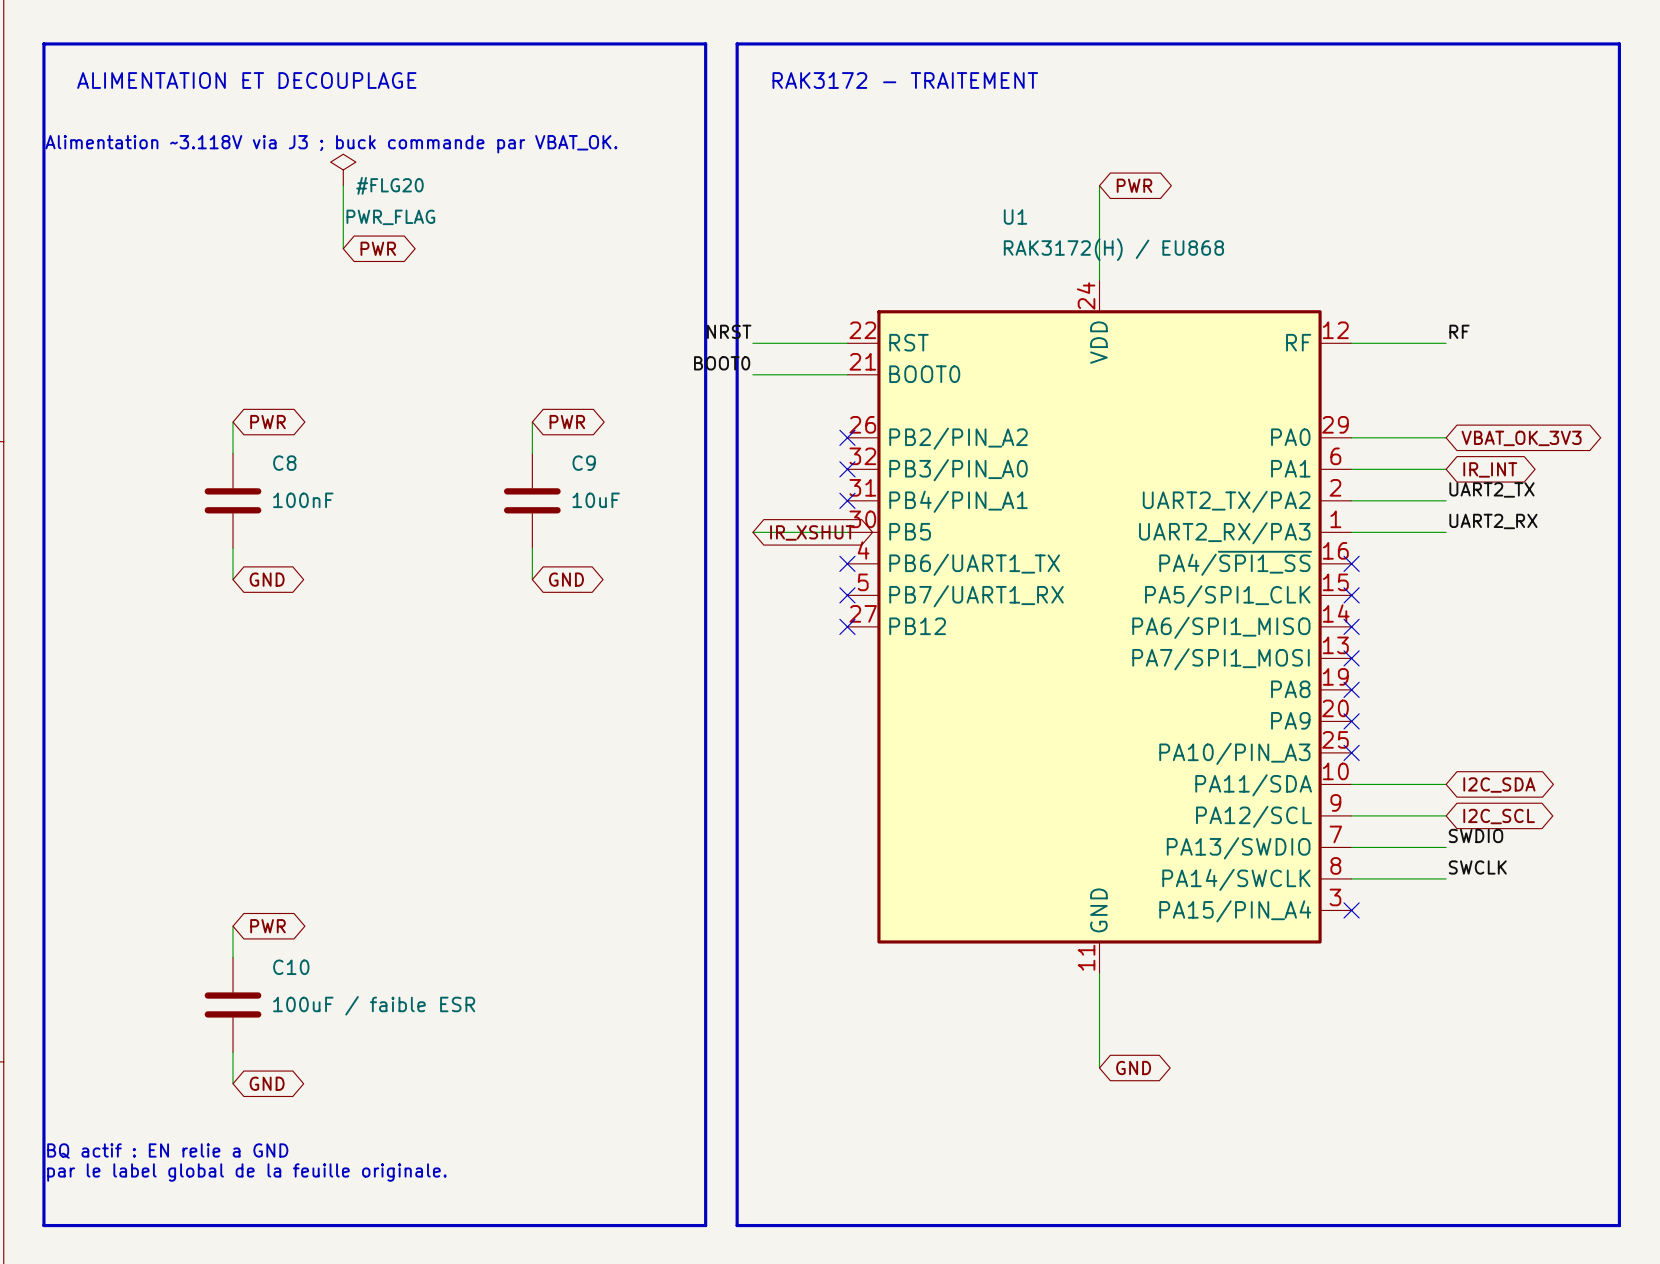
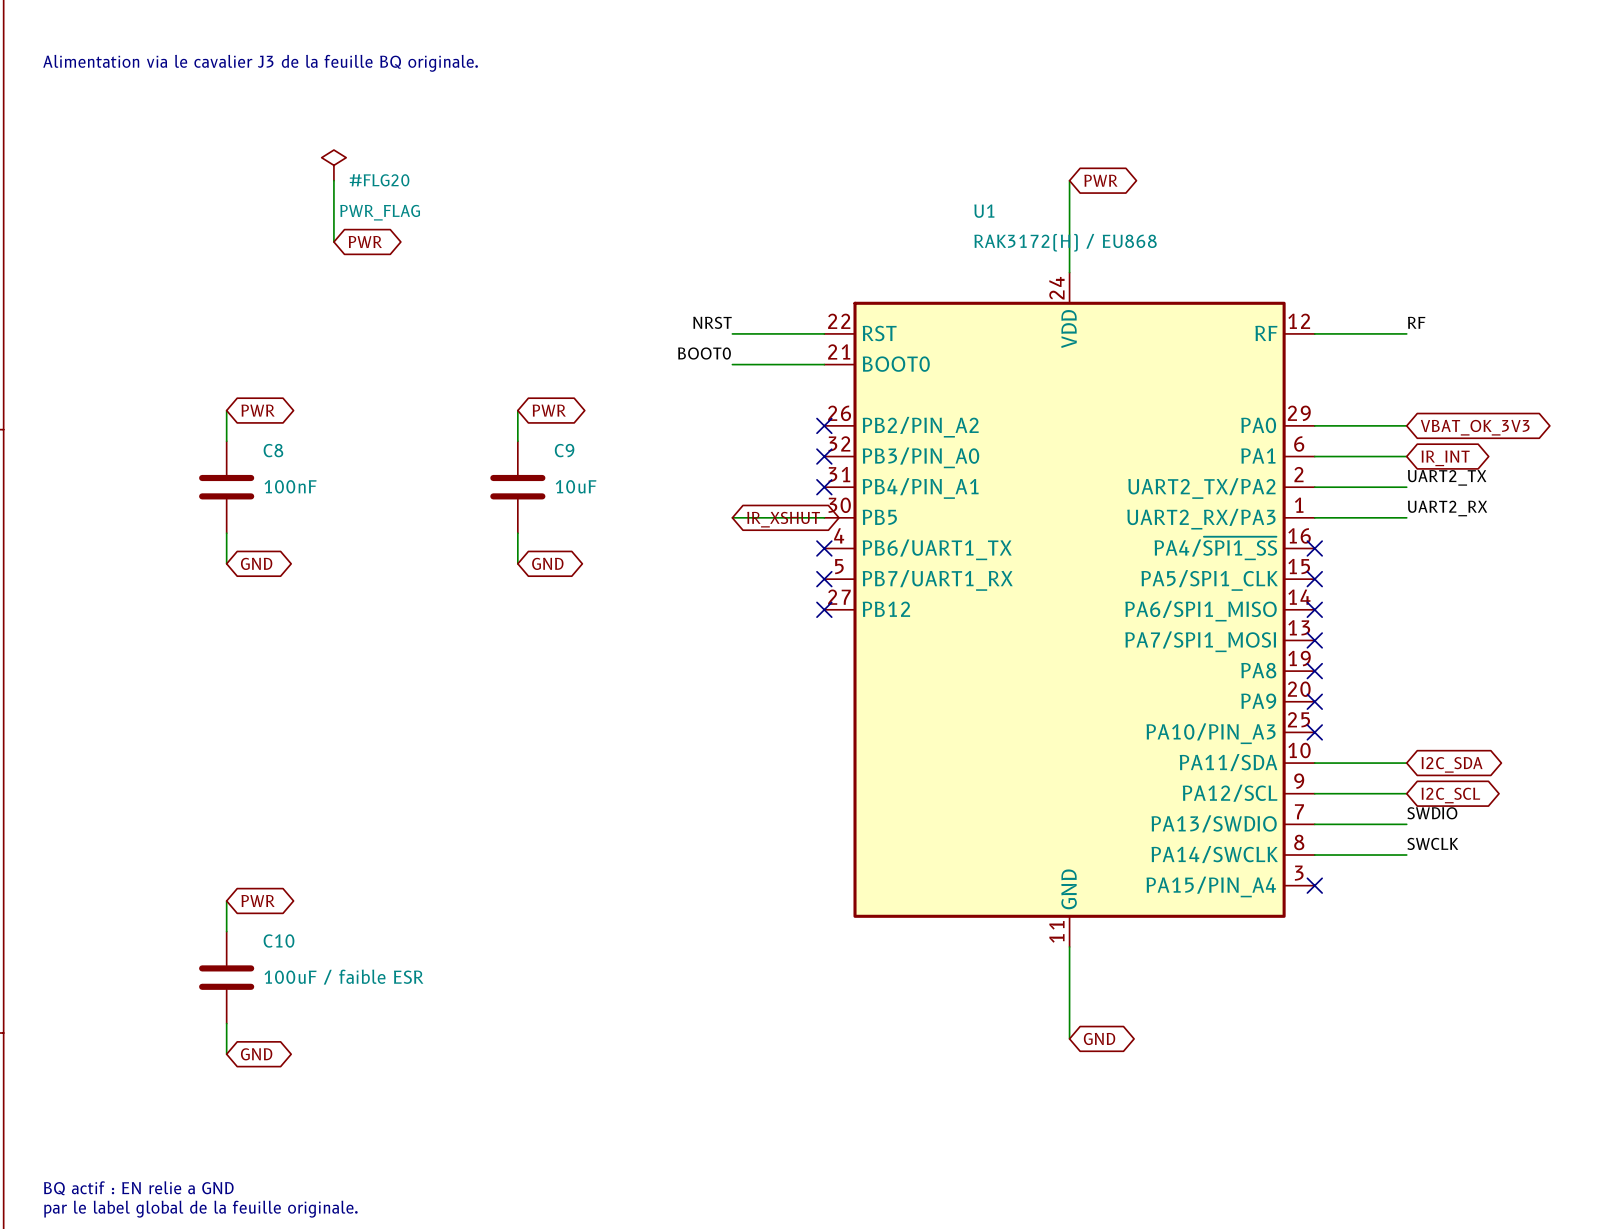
line: (43, 43) (705, 43) (705, 1225) (43, 1225) (43, 43) -> none
line: (737, 43) (1619, 43) (1619, 1225) (737, 1225) (737, 43) -> none
text: none -> Alimentation via le cavalier J3 de la feuille BQ originale. (260, 63)
text: ALIMENTATION ET DECOUPLAGE (246, 80) -> none
text: RAK3172 - TRAITEMENT (905, 80) -> none
text: Alimentation ~3.118V via J3 ; buck commande par VBAT_OK. (331, 144) -> none
text position: BQ actif : EN relie a GND (167, 1151) -> BQ actif : EN relie a GND (138, 1188)
text position: par le label global de la feuille originale. (246, 1172) -> par le label global de la feuille originale. (201, 1209)

